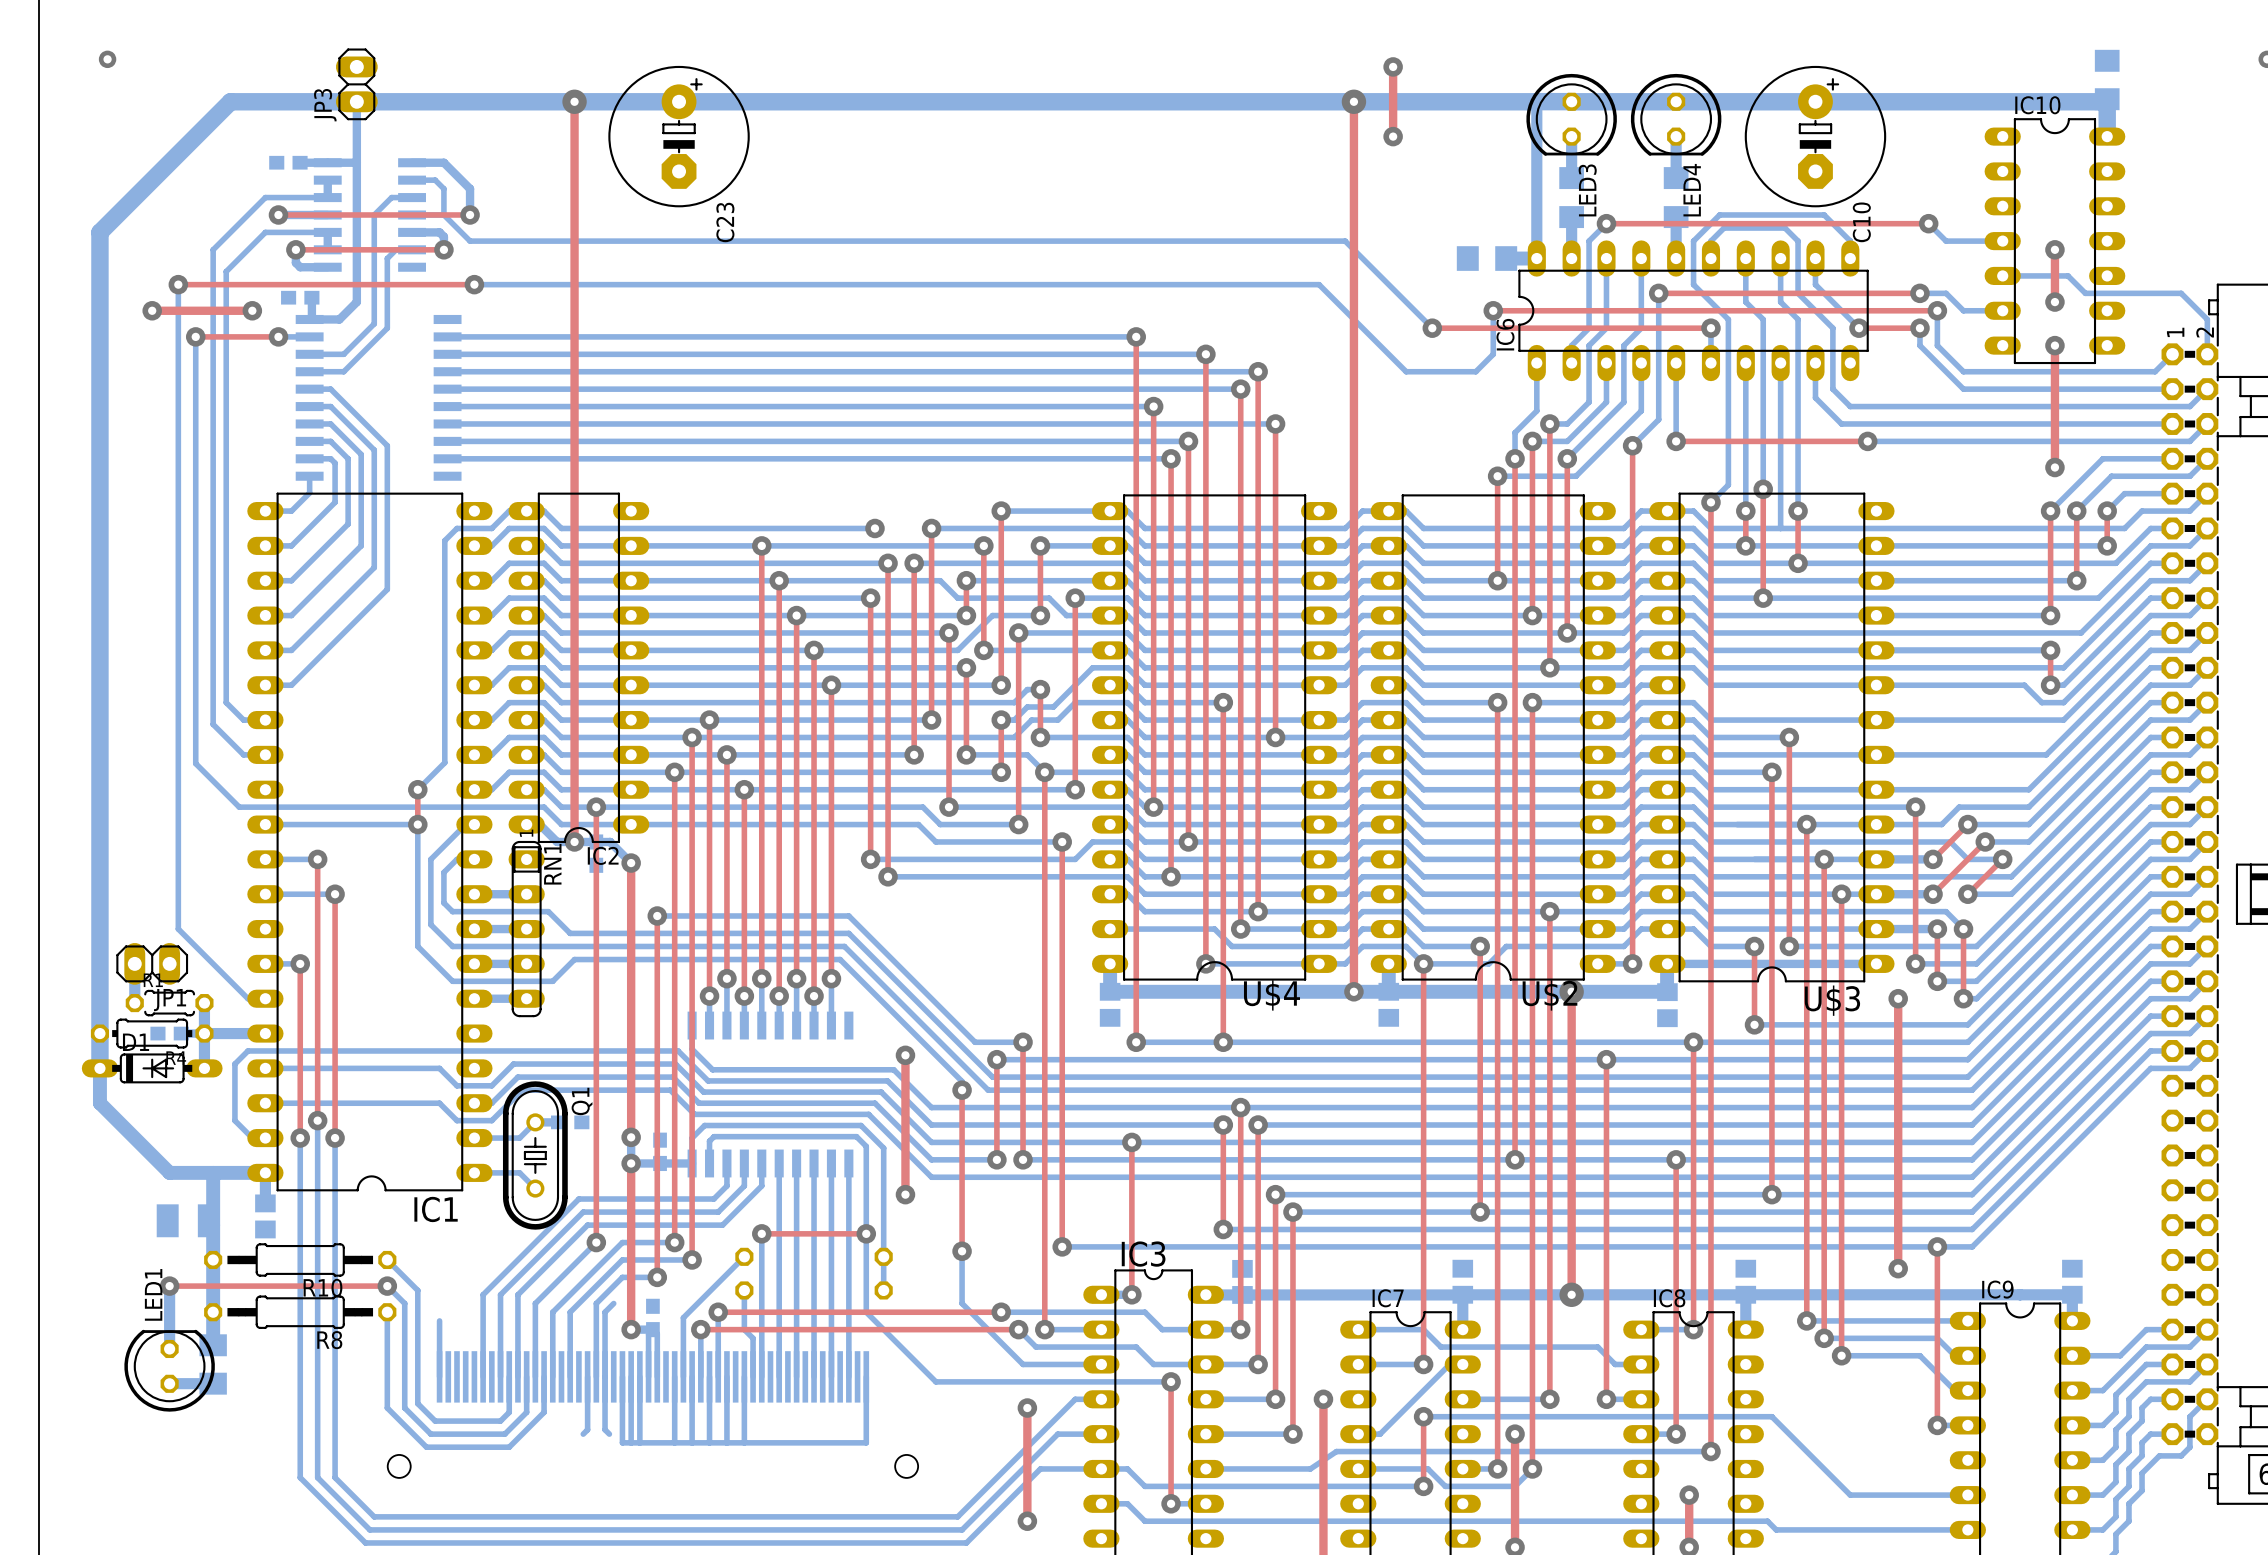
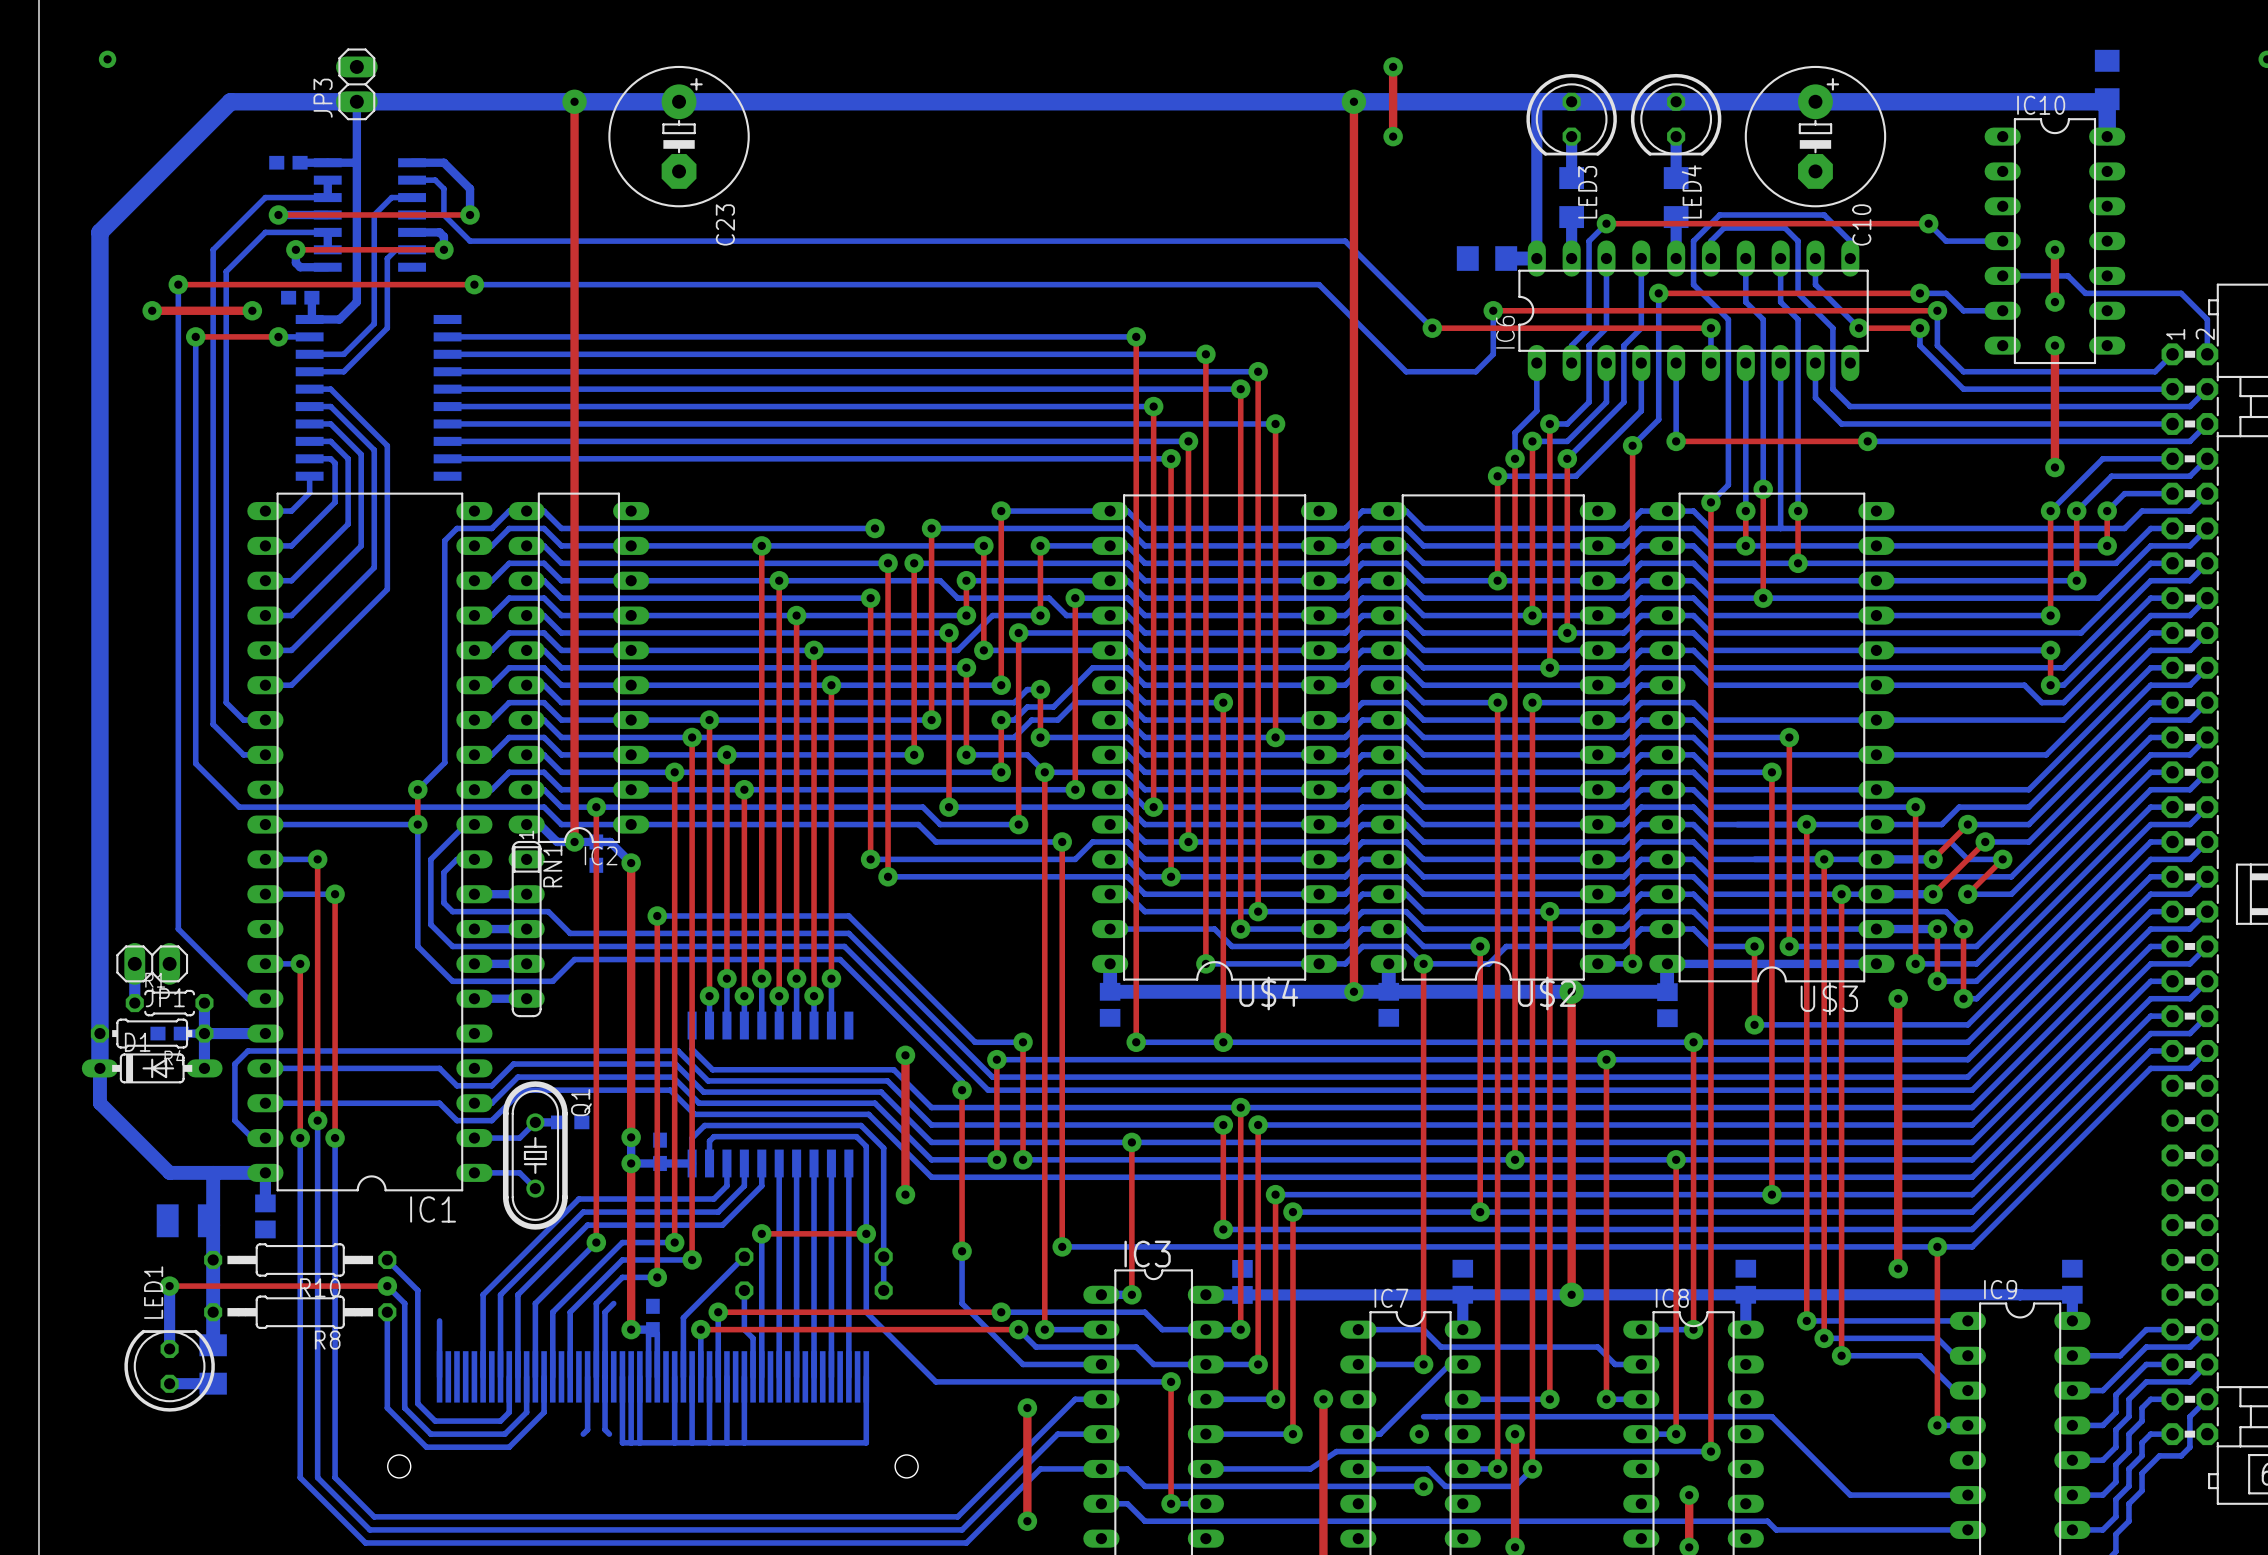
top track: (1423, 1416) (1423, 1486) -> none
via position: (1423, 1416) -> (1419, 1434)

